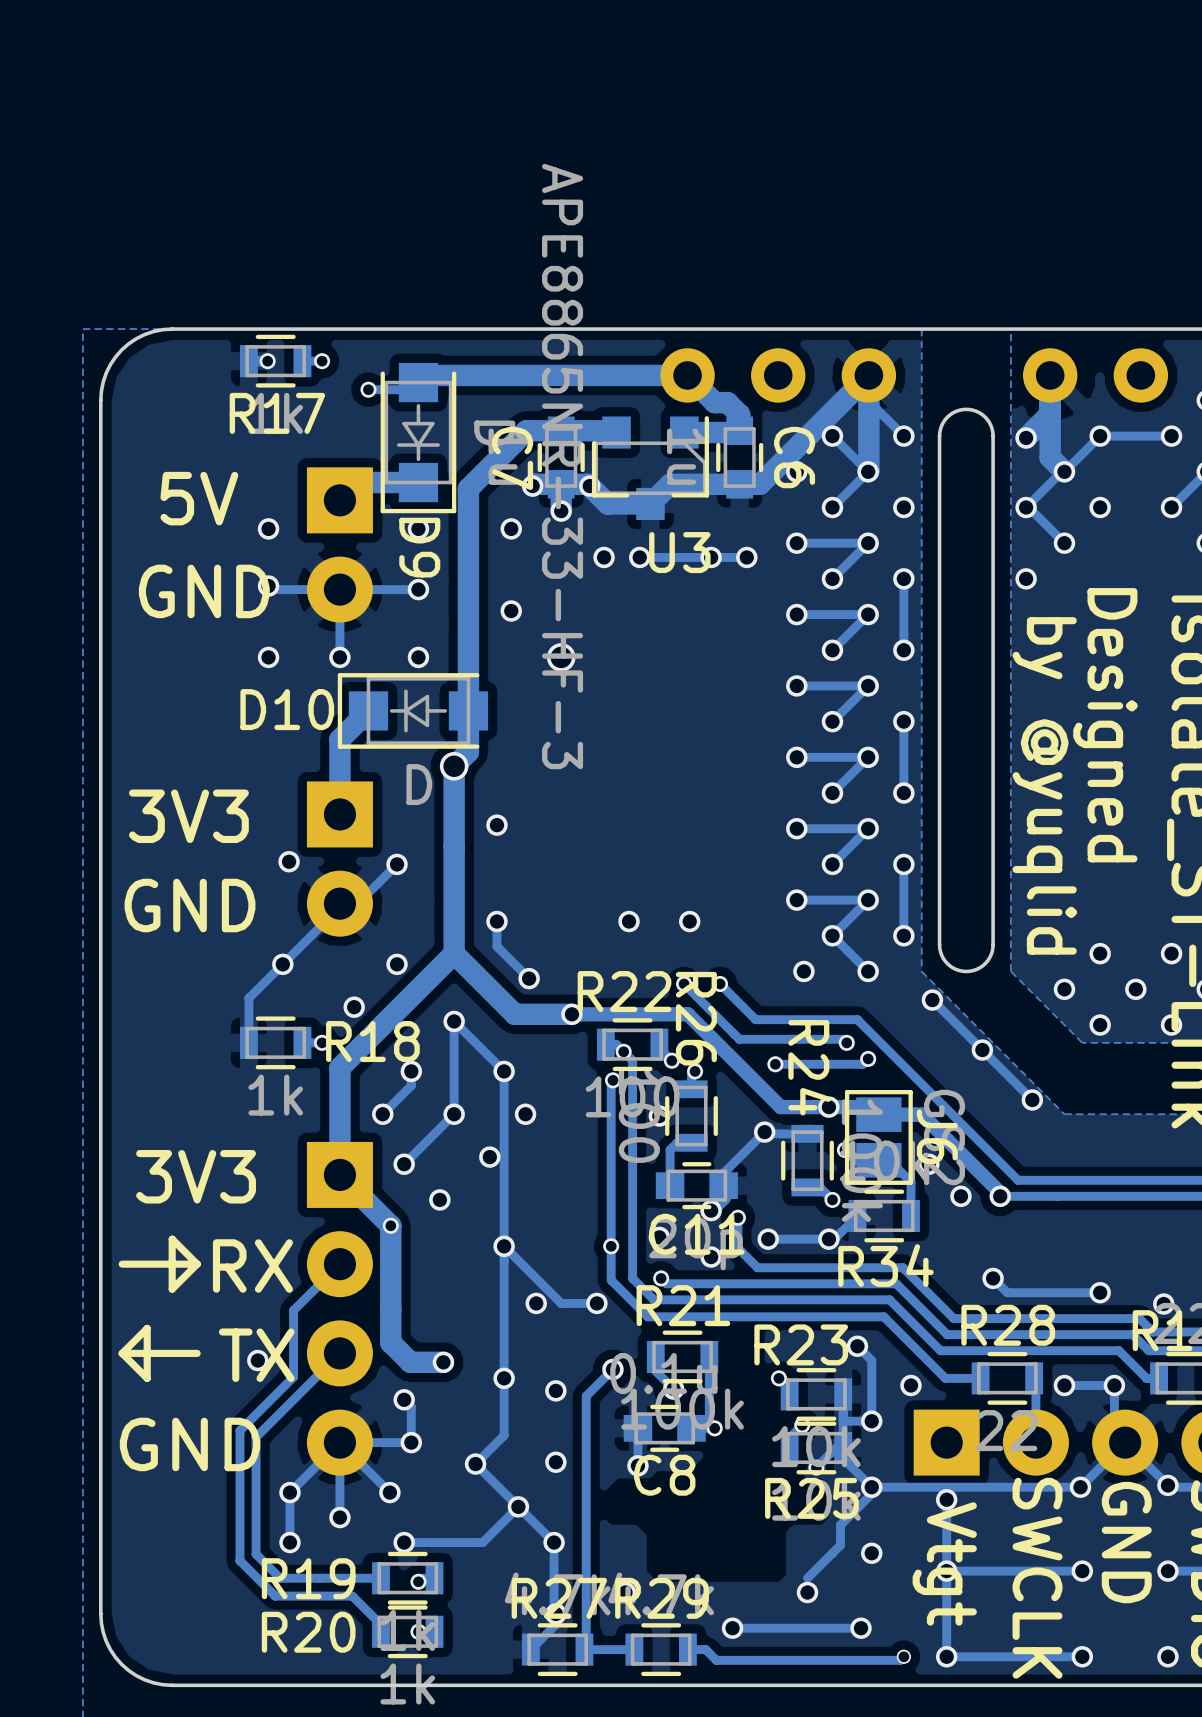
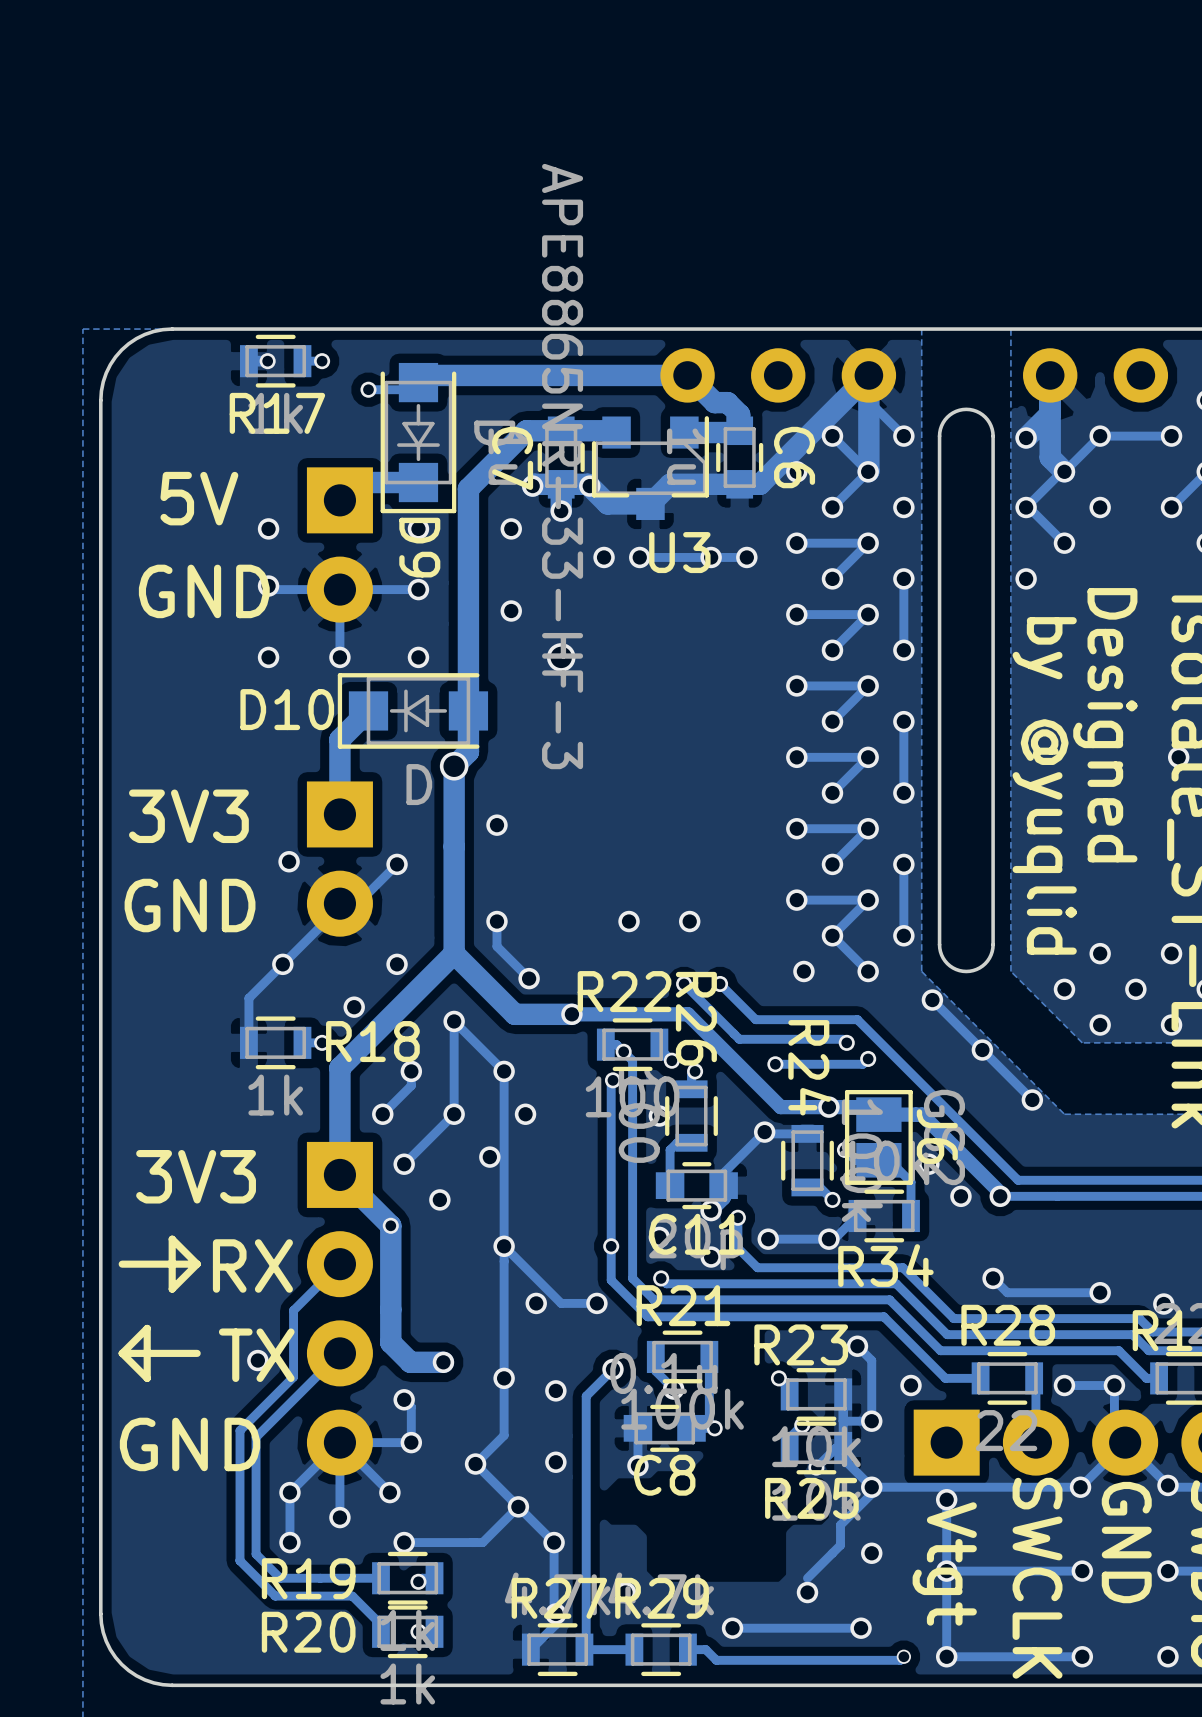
via: none -> (1178, 757)

